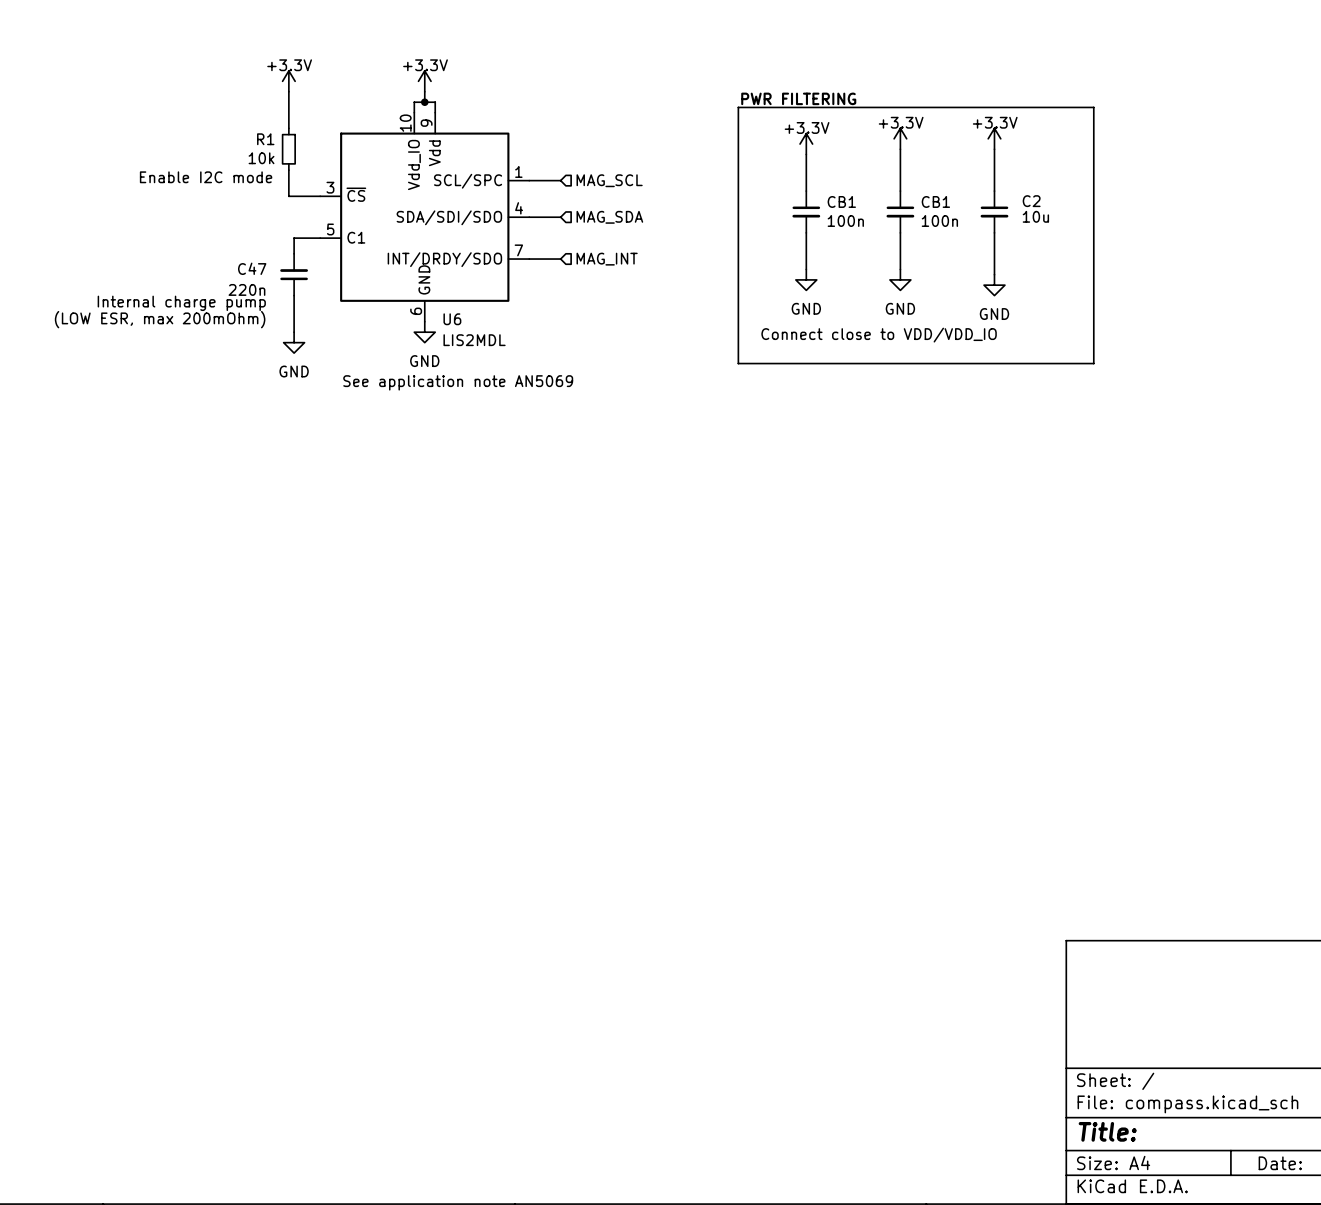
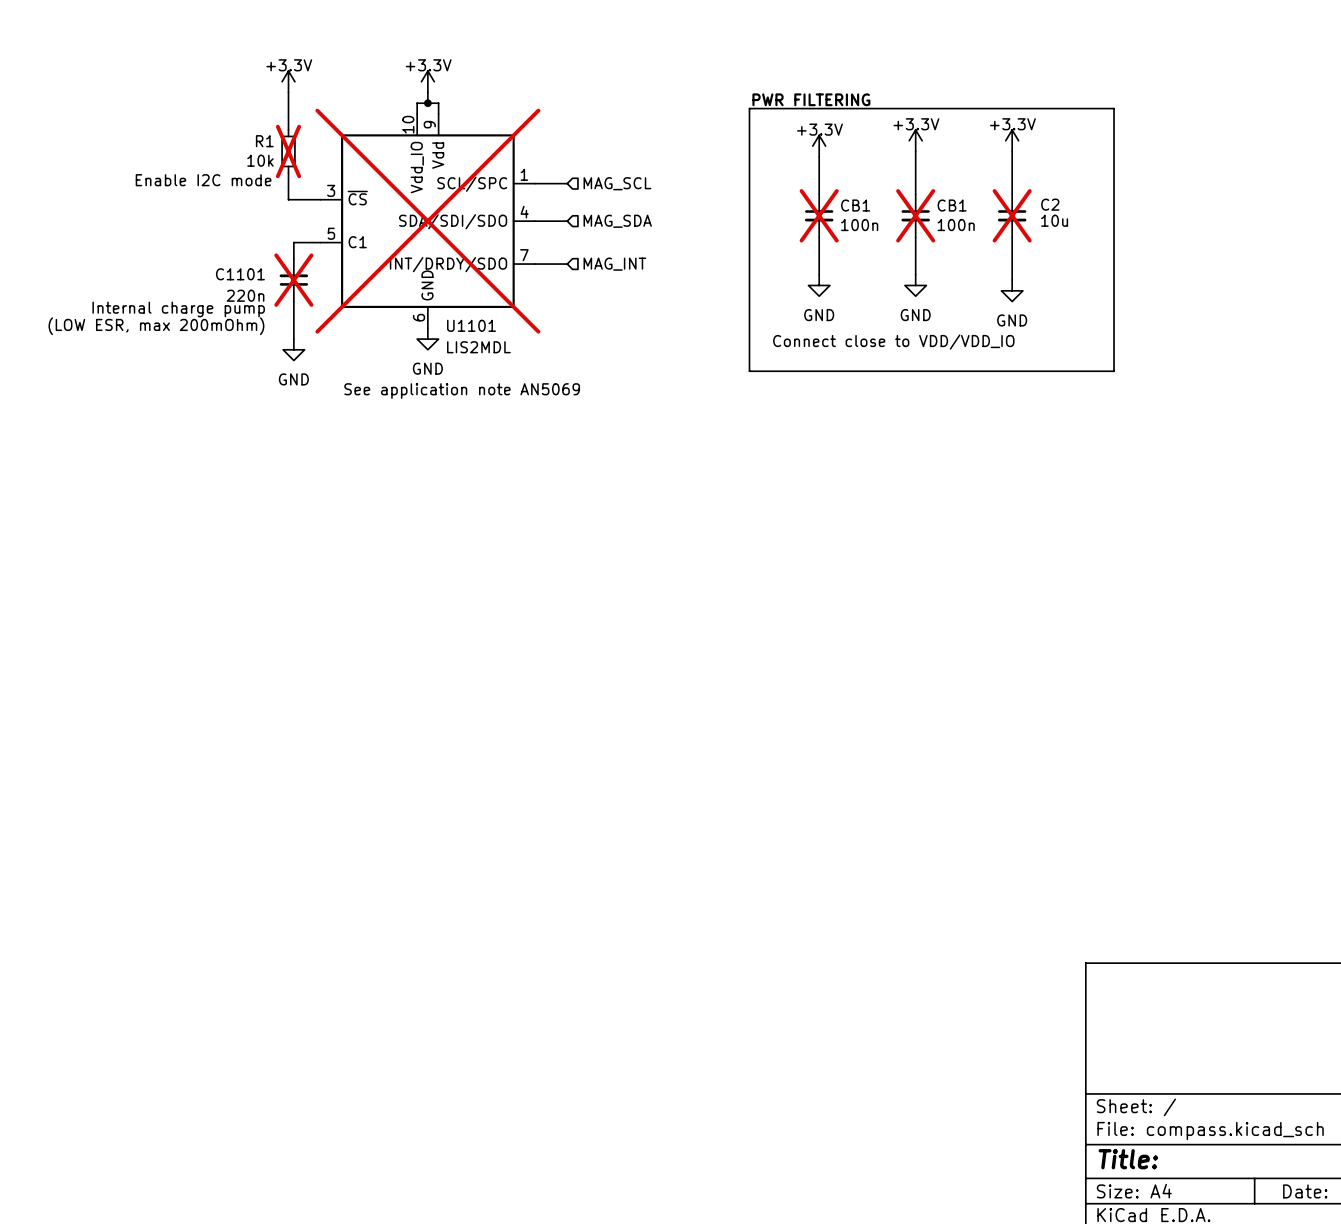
R1 do-not-place cross: none -> (288, 151)
CB1 do-not-place cross: none -> (819, 215)
CB1 do-not-place cross: none -> (915, 215)
C2 do-not-place cross: none -> (1012, 215)
U6 do-not-place cross: none -> (427, 221)
C47 name: C47 (252, 268) -> C1101 (240, 274)
C47 do-not-place cross: none -> (293, 280)
U6 name: U6 (452, 319) -> U1101 (471, 325)

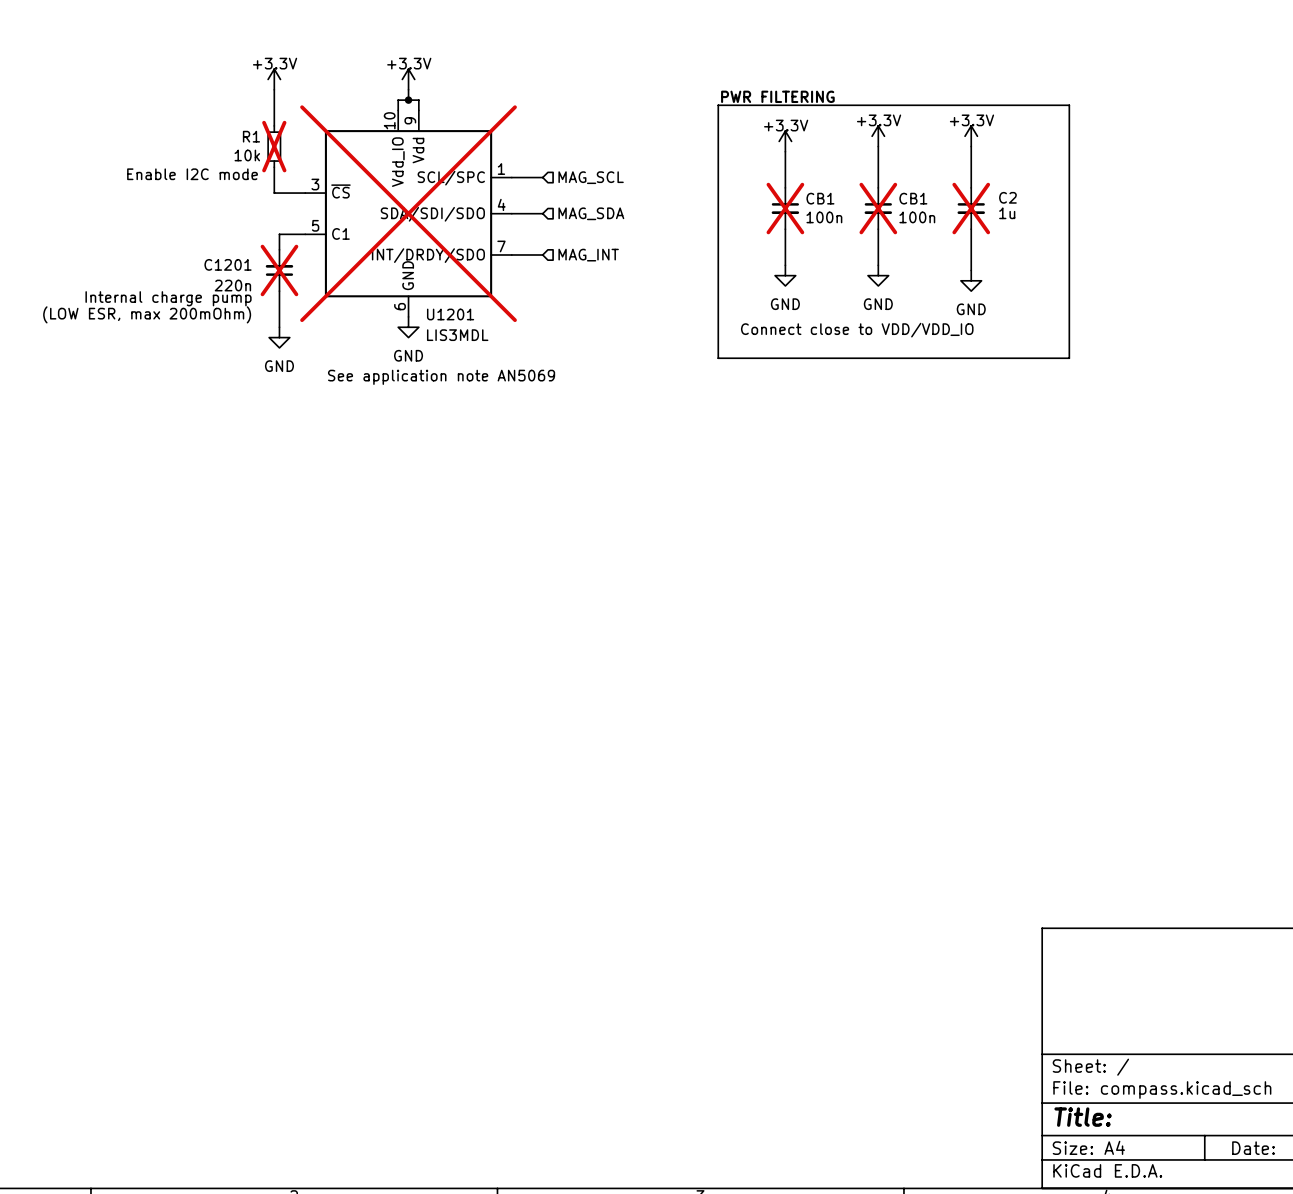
C2 value: 10u (1054, 220) -> 1u (1007, 213)
C1101 name: C1101 (240, 274) -> C1201 (228, 264)
U1101 name: U1101 (471, 325) -> U1201 (450, 314)
U1101 value: LIS2MDL (478, 347) -> LIS3MDL (457, 335)

